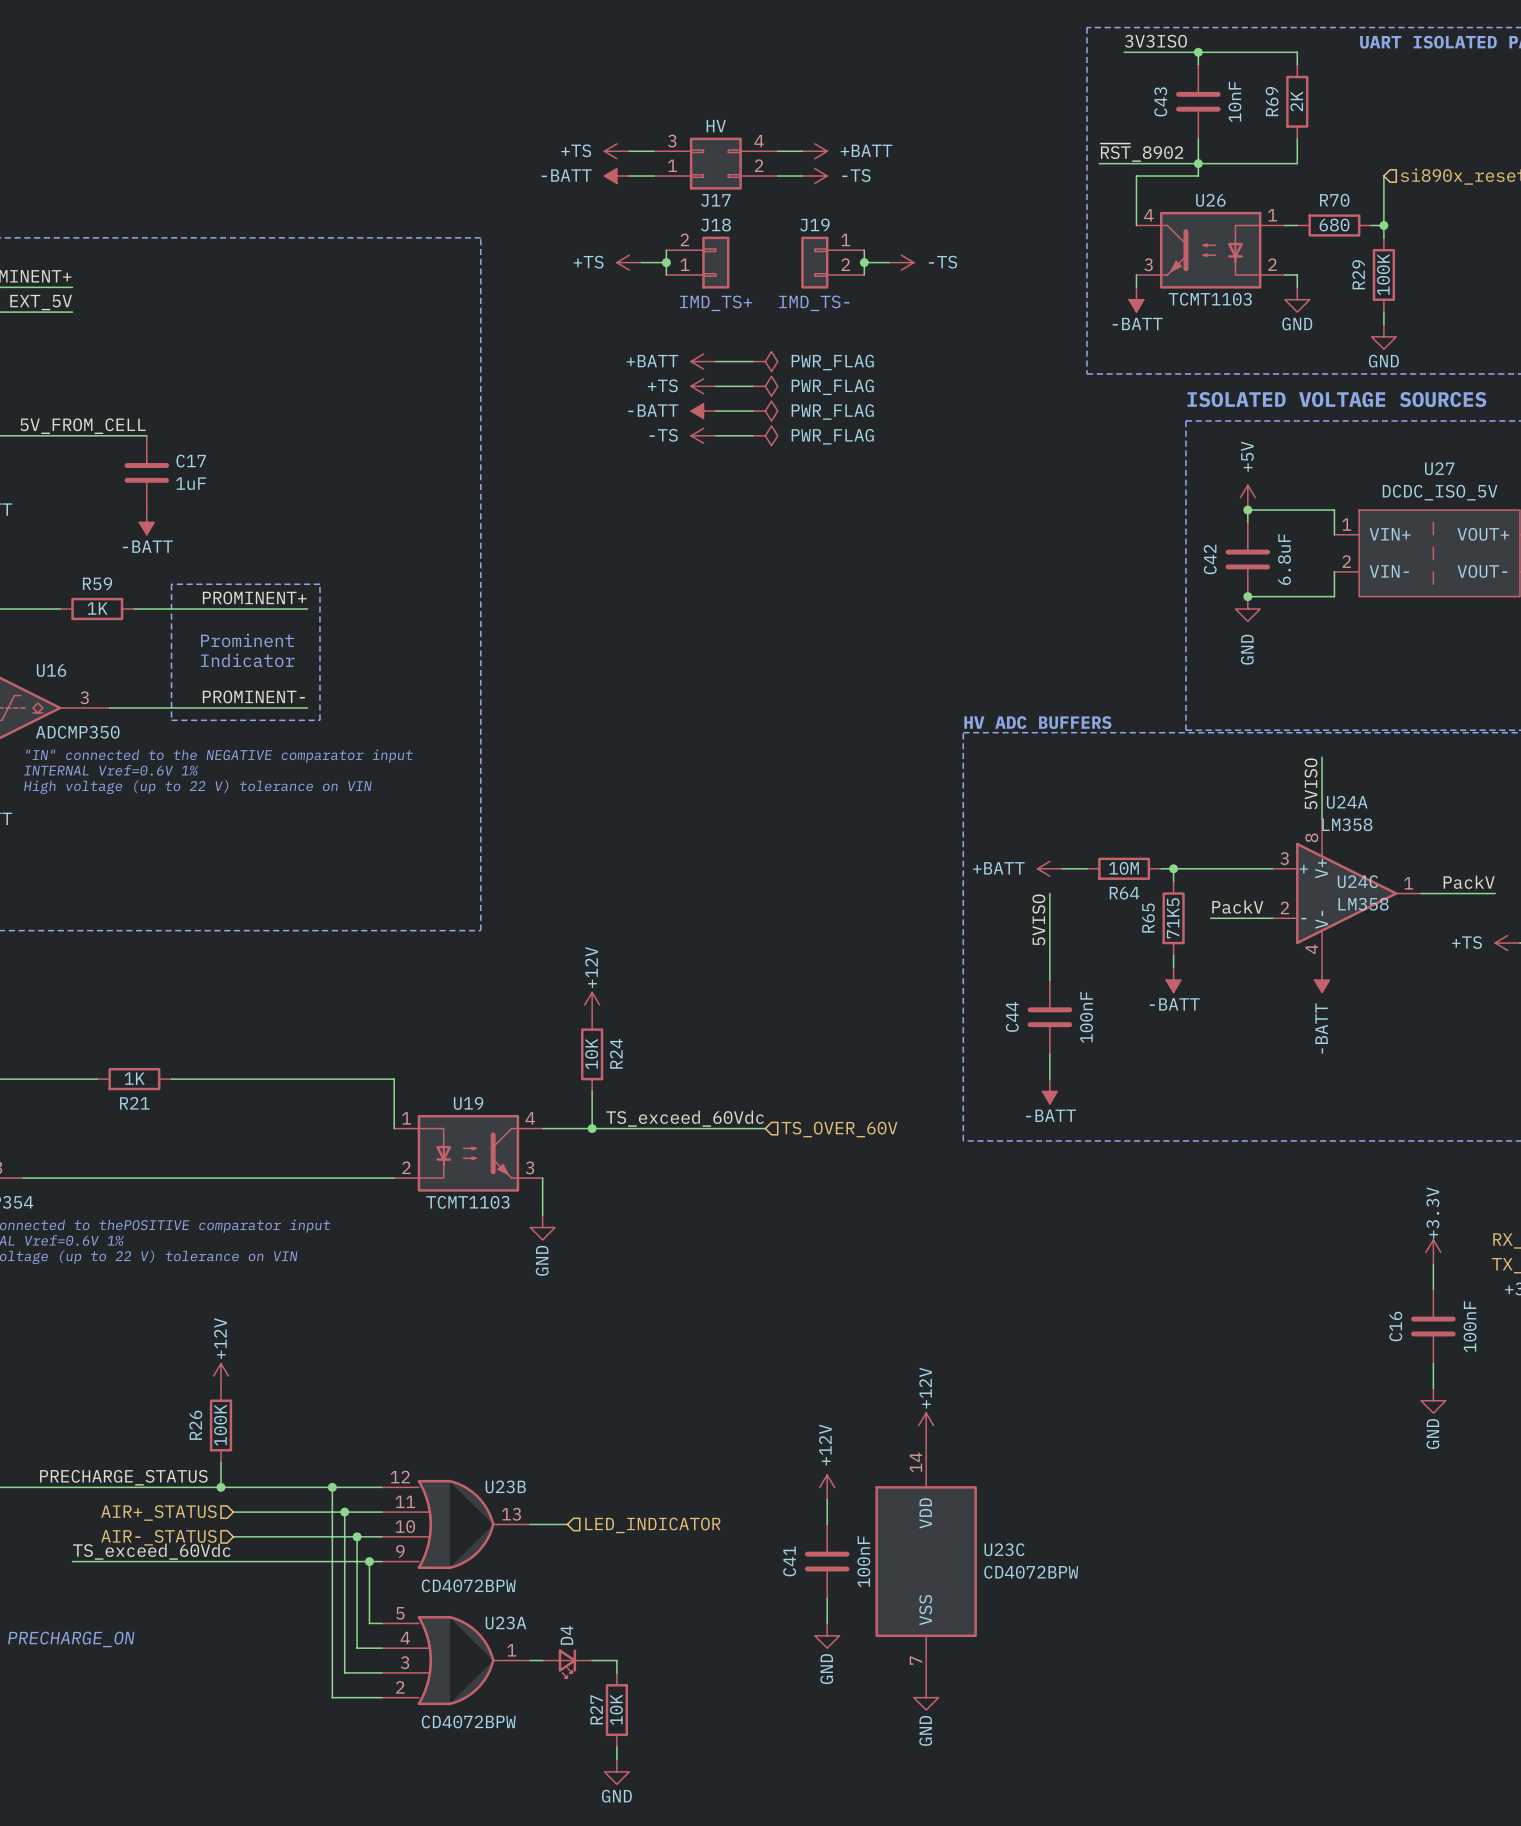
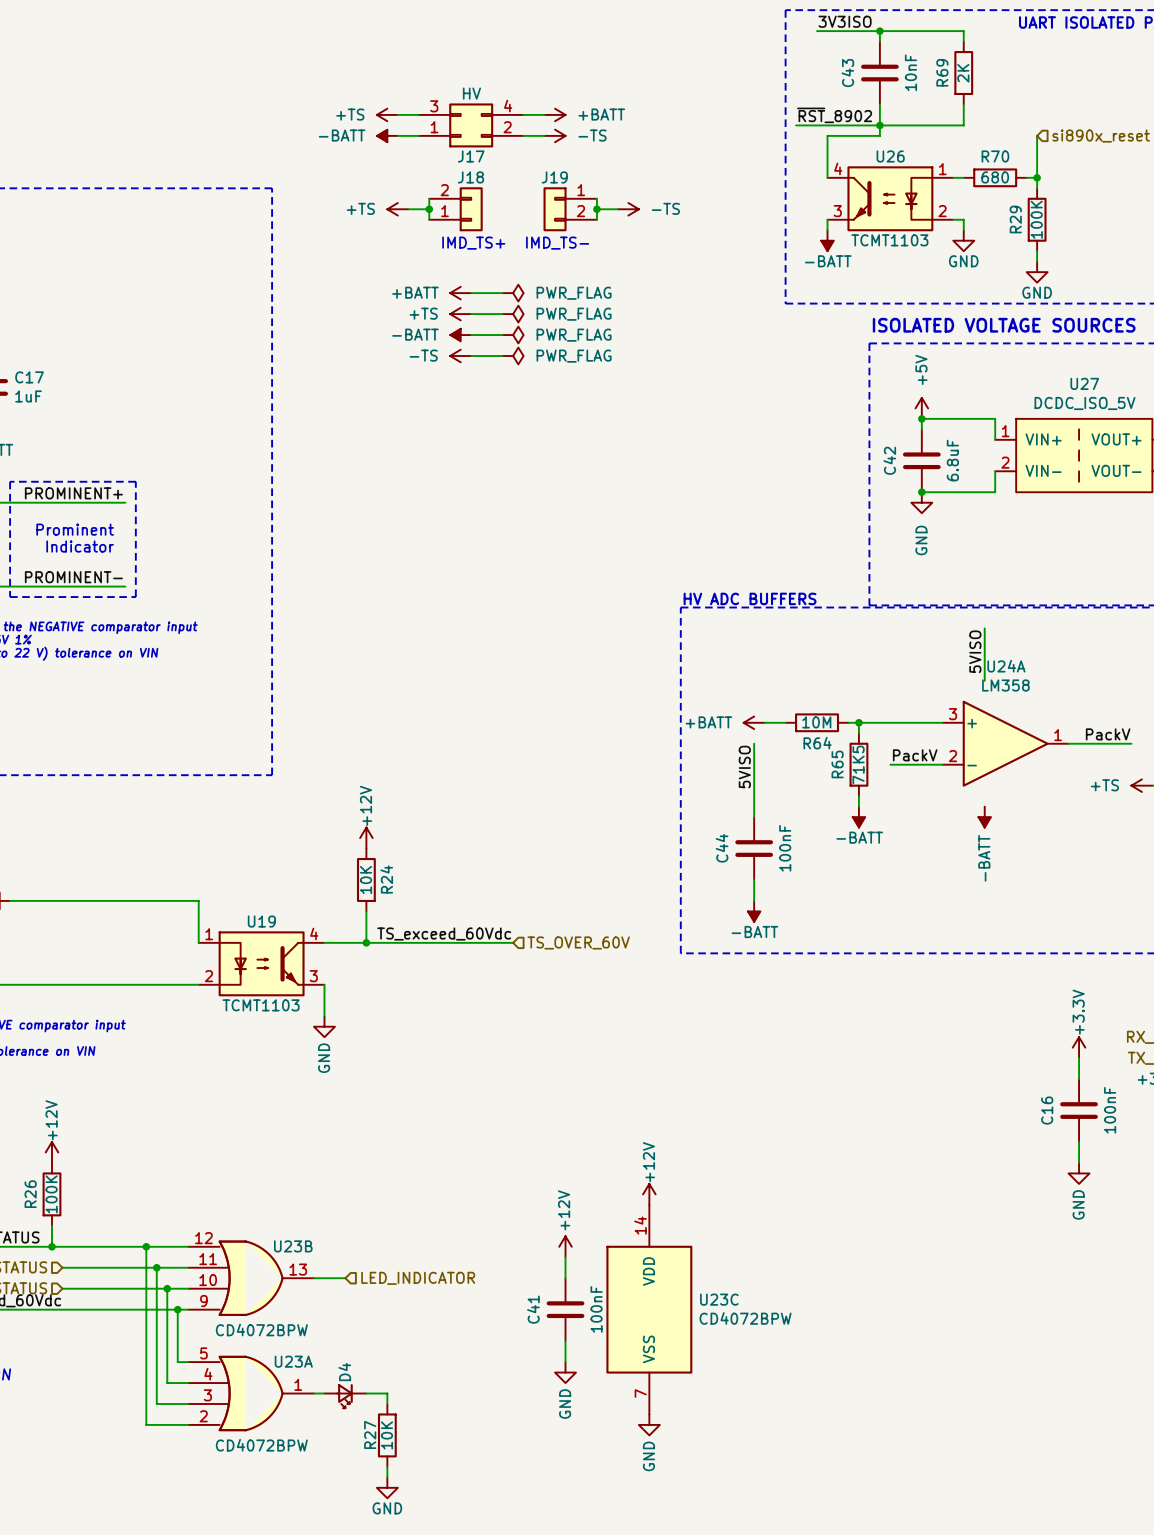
U24C: LM358 (1322, 893) -> none

